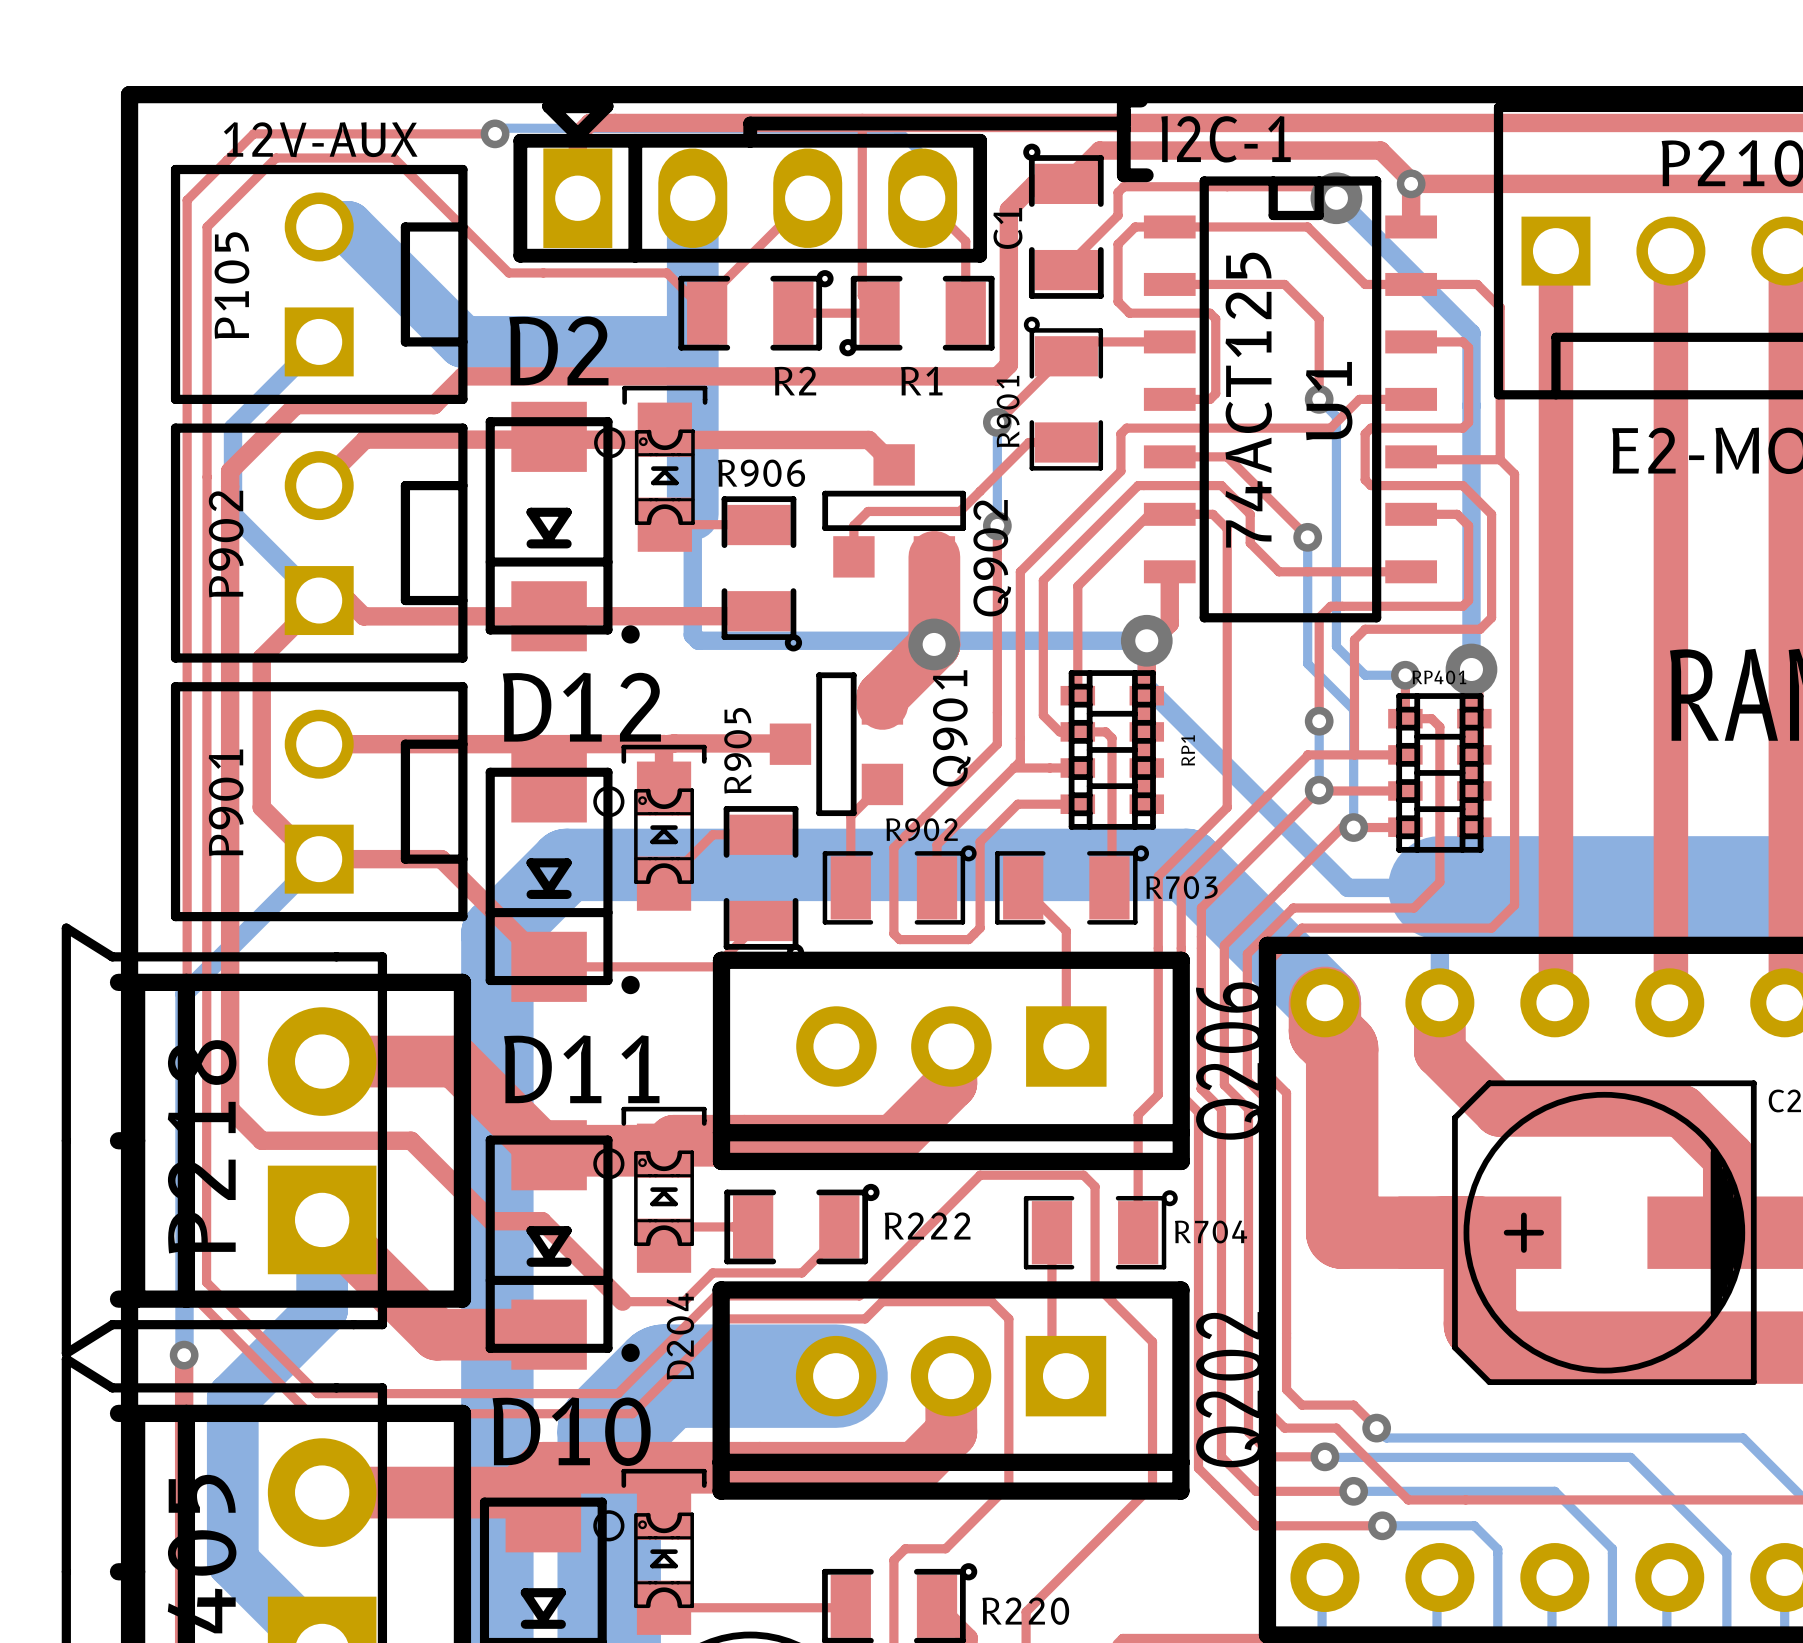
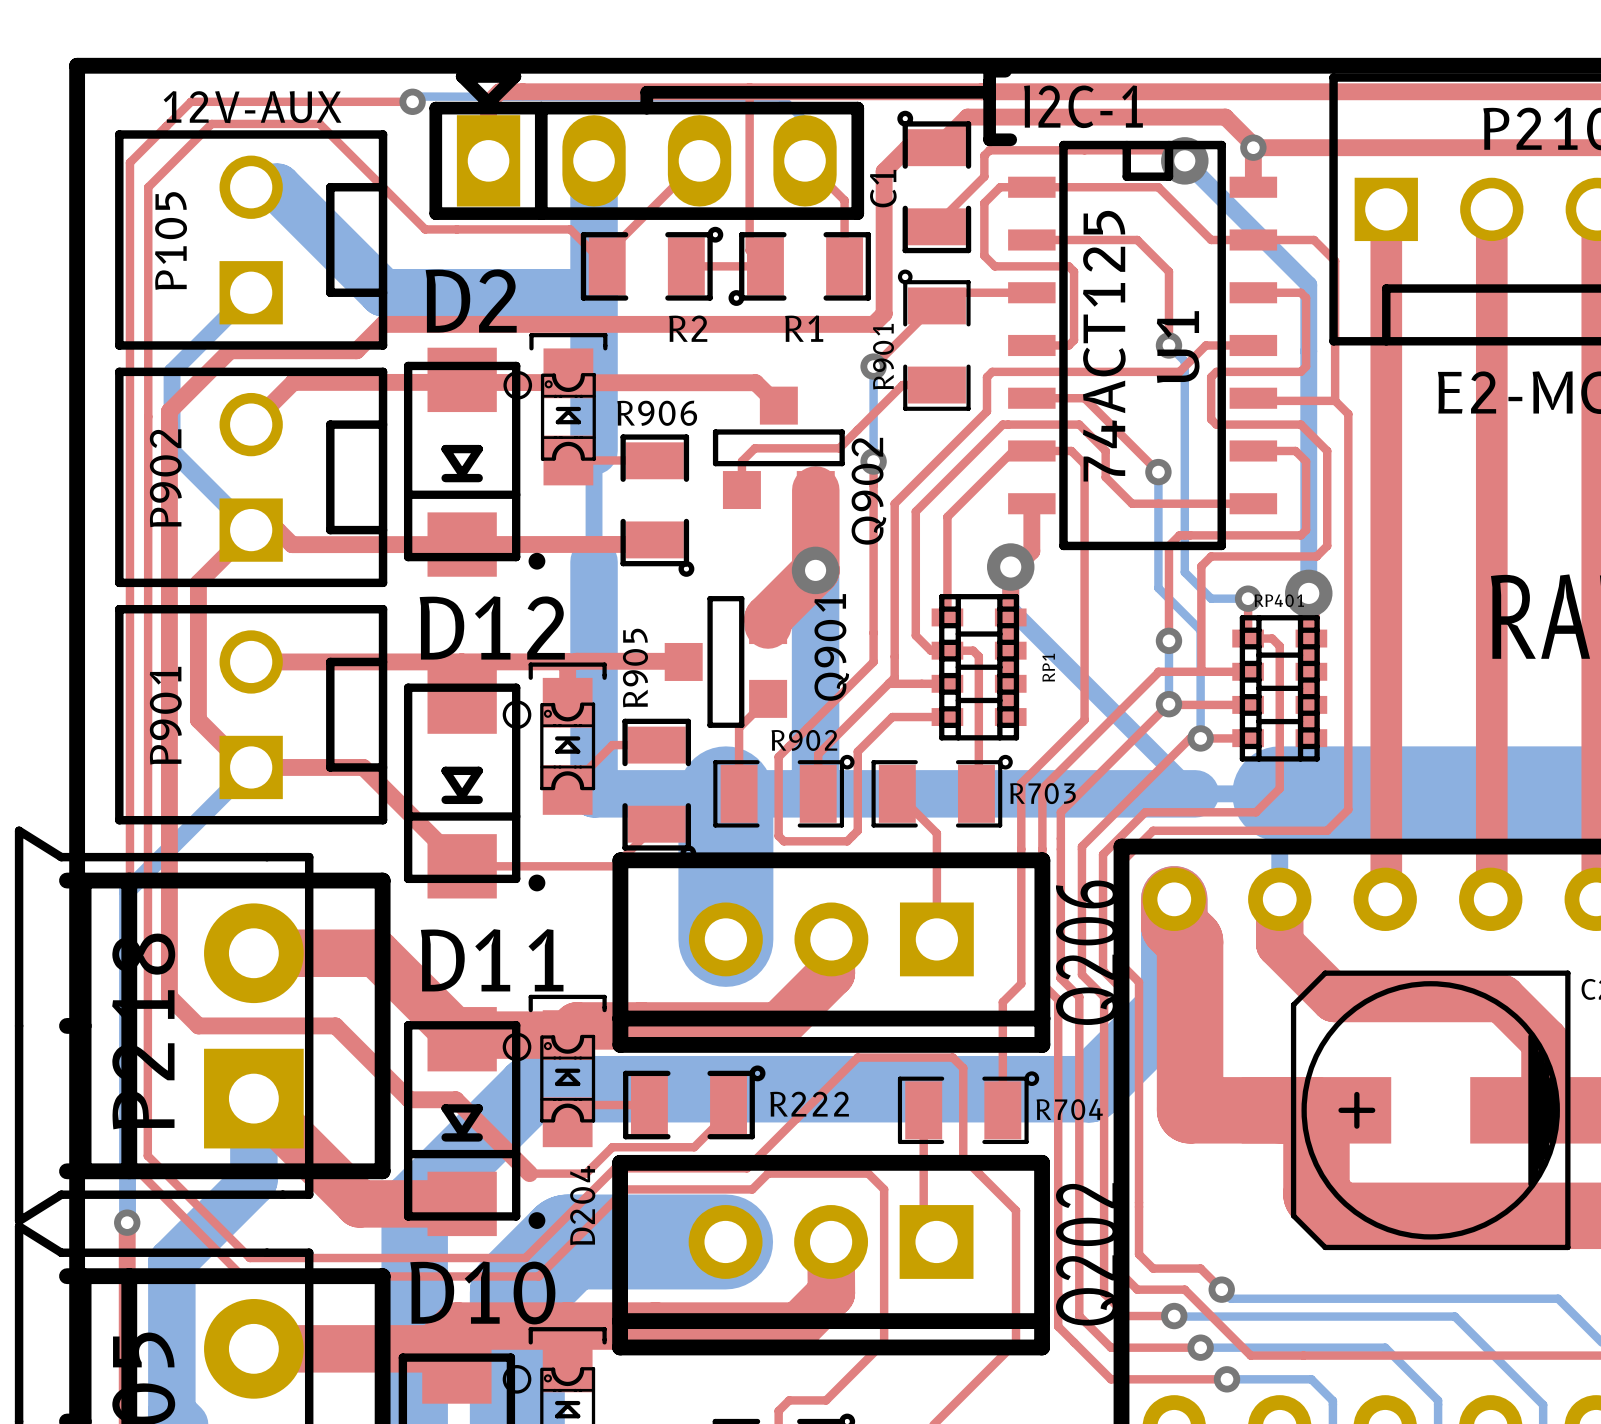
bottom track: (692, 635) (698, 640) (1146, 640) -> (594, 561) (594, 793) (1195, 793)
bottom track: none -> (815, 570) (815, 793)
bottom track: none -> (725, 793) (725, 939)
bottom track: (1324, 1002) (1187, 864) (566, 864) (497, 933) (497, 1336) -> (1174, 899) (1174, 1004) (1089, 1089) (530, 1089) (414, 1205)

